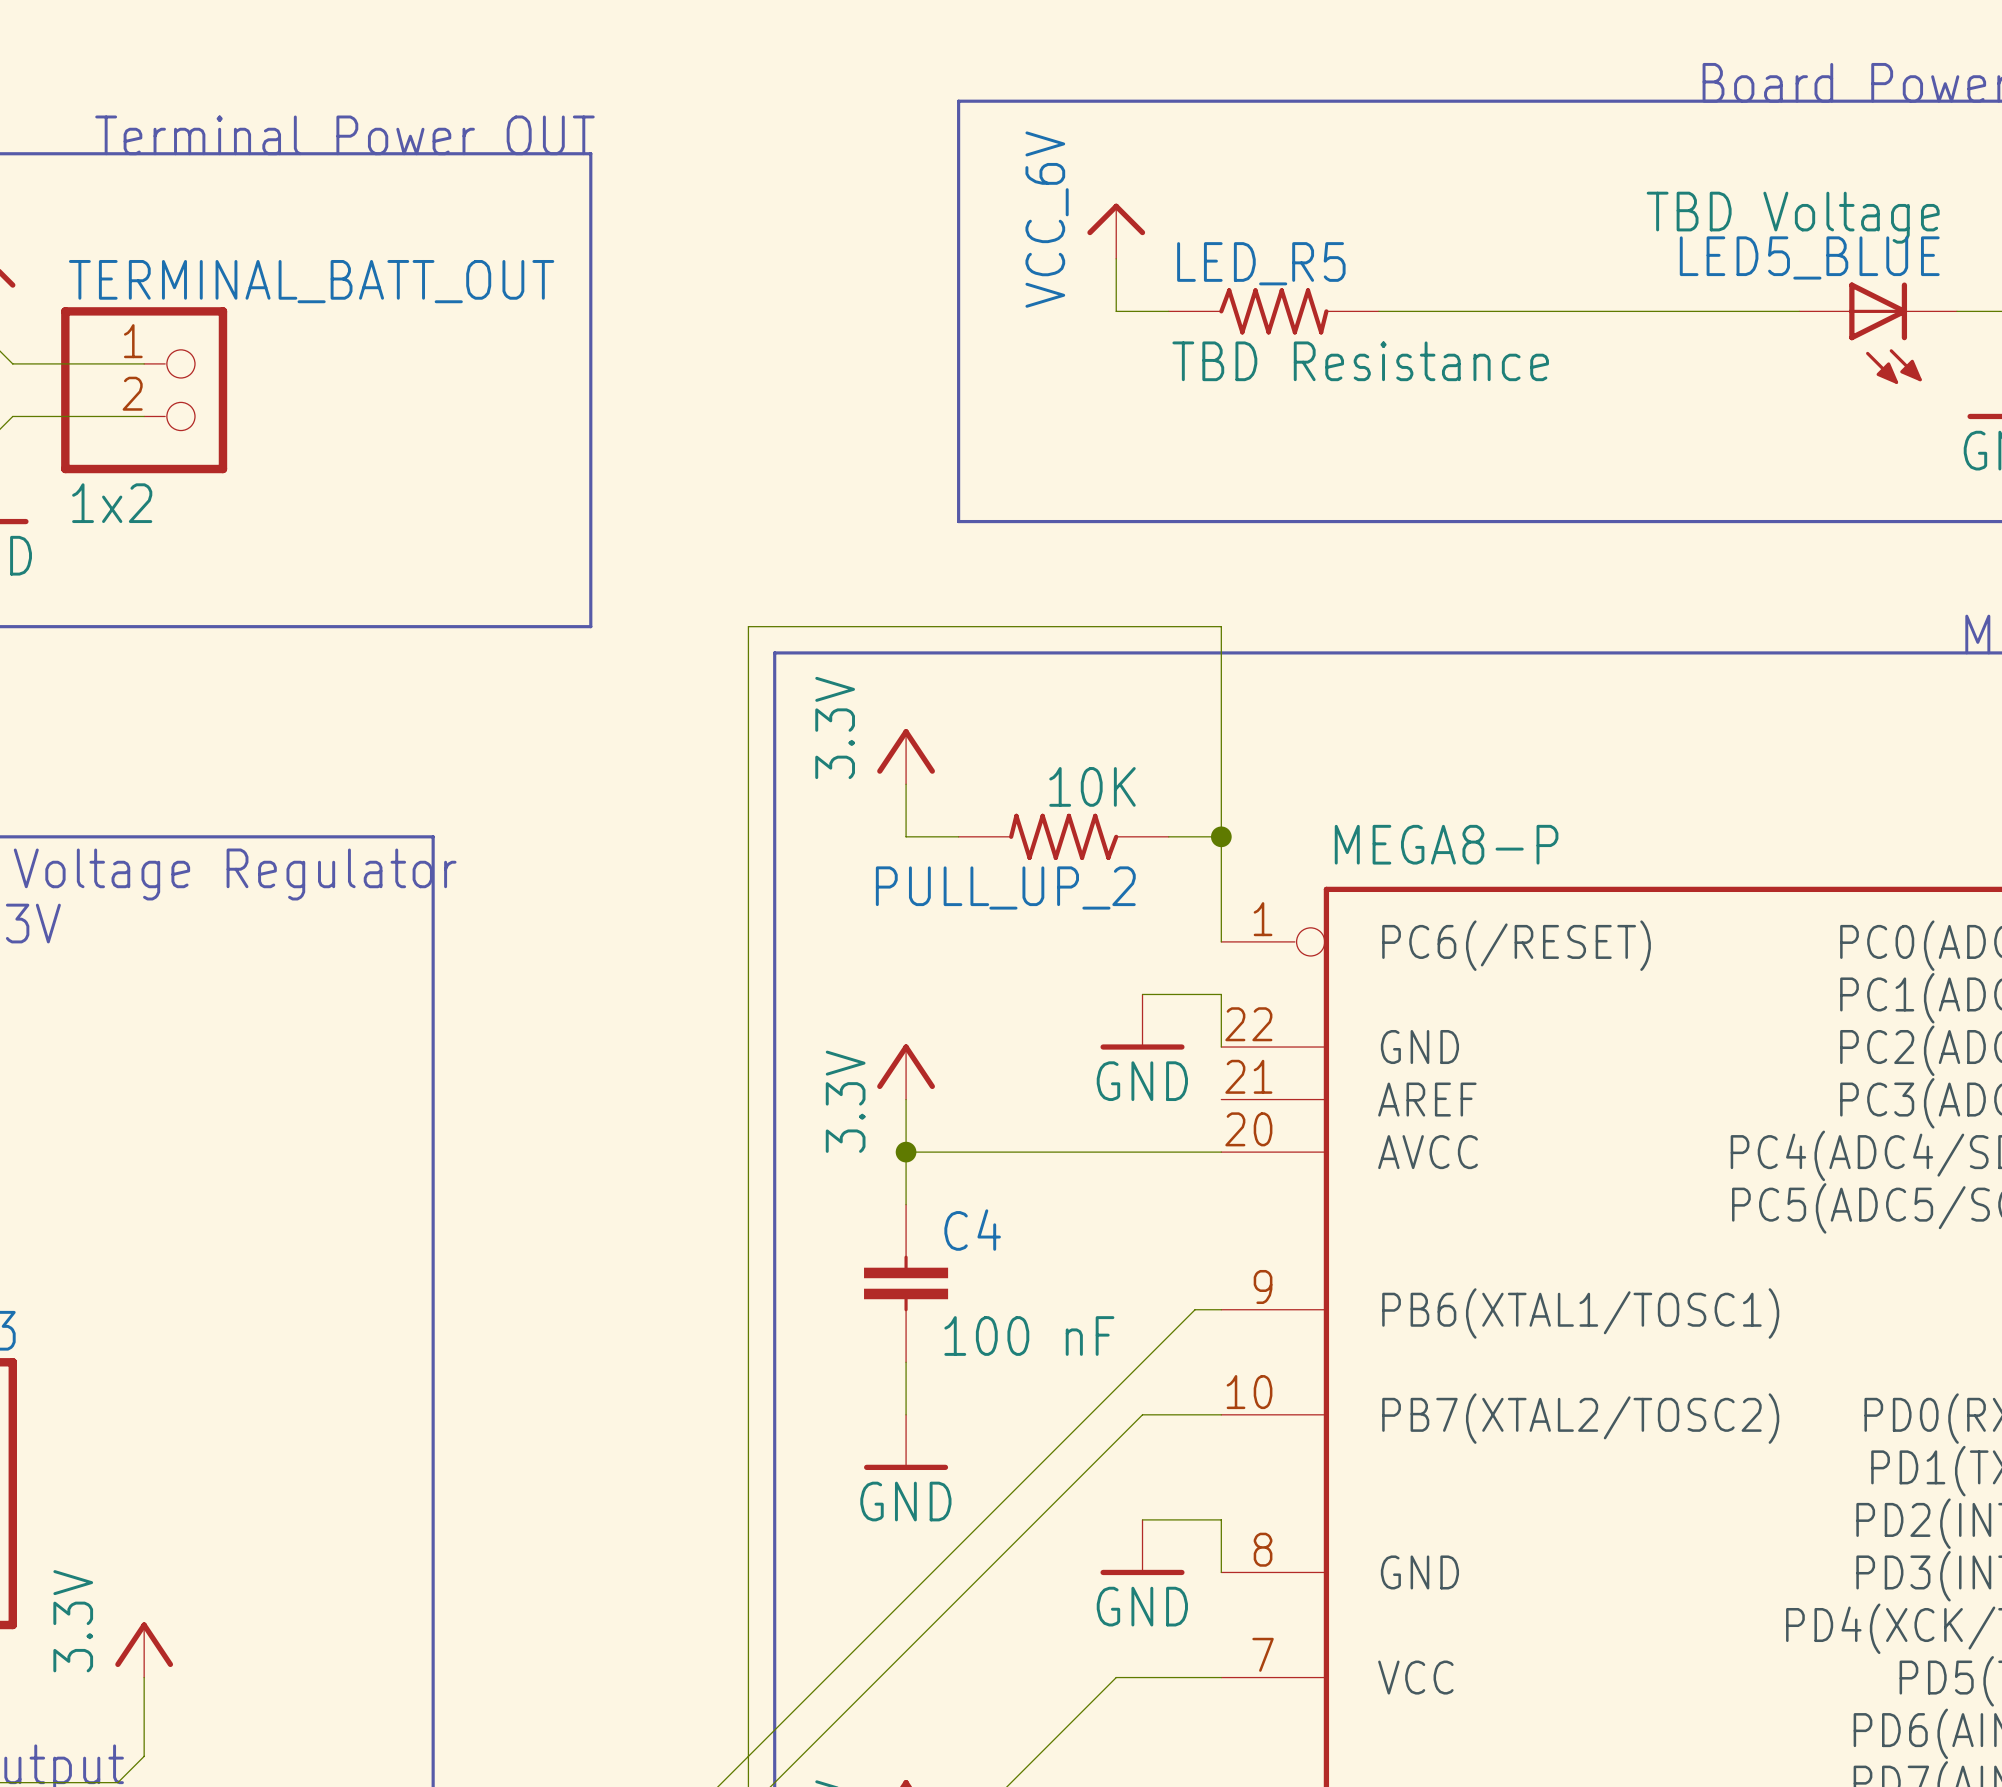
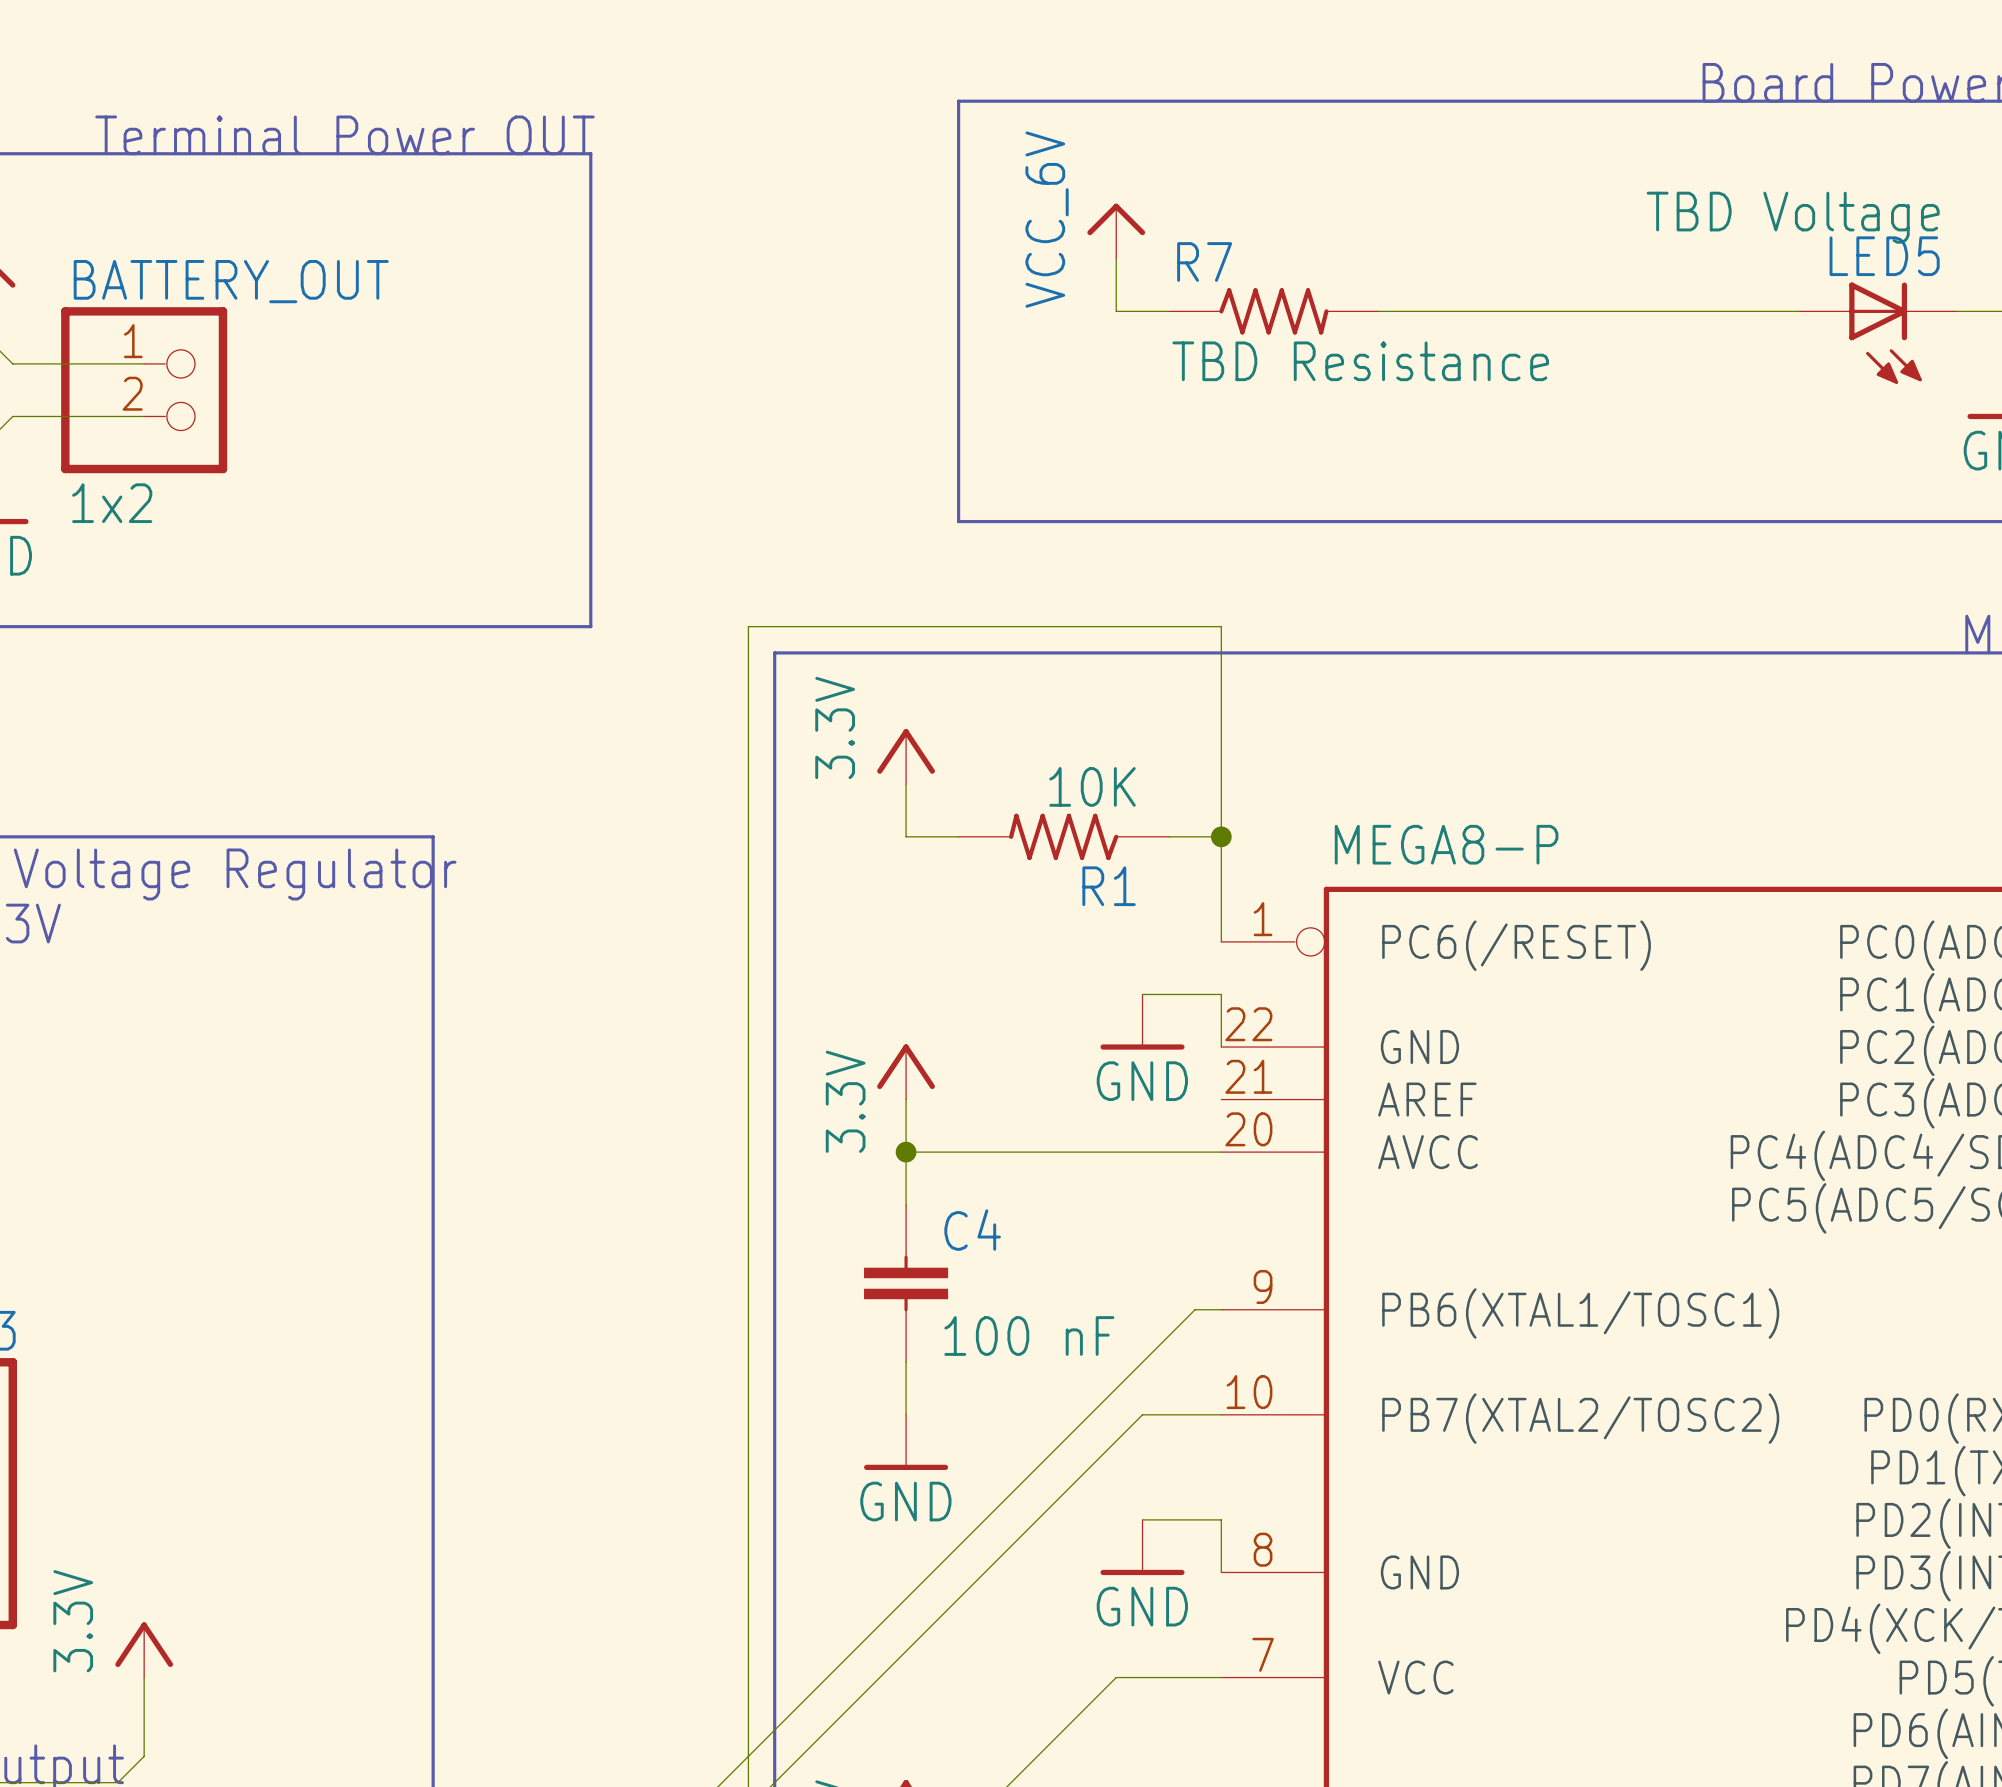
LED5_BLUE name: LED5_BLUE (1809, 257) -> LED5 (1884, 256)
LED_R5 name: LED_R5 (1261, 263) -> R7 (1204, 261)
TERMINAL_BATT_OUT name: TERMINAL_BATT_OUT (311, 281) -> BATTERY_OUT (231, 281)
PULL_UP_2 name: PULL_UP_2 (1005, 887) -> R1 (1109, 886)

